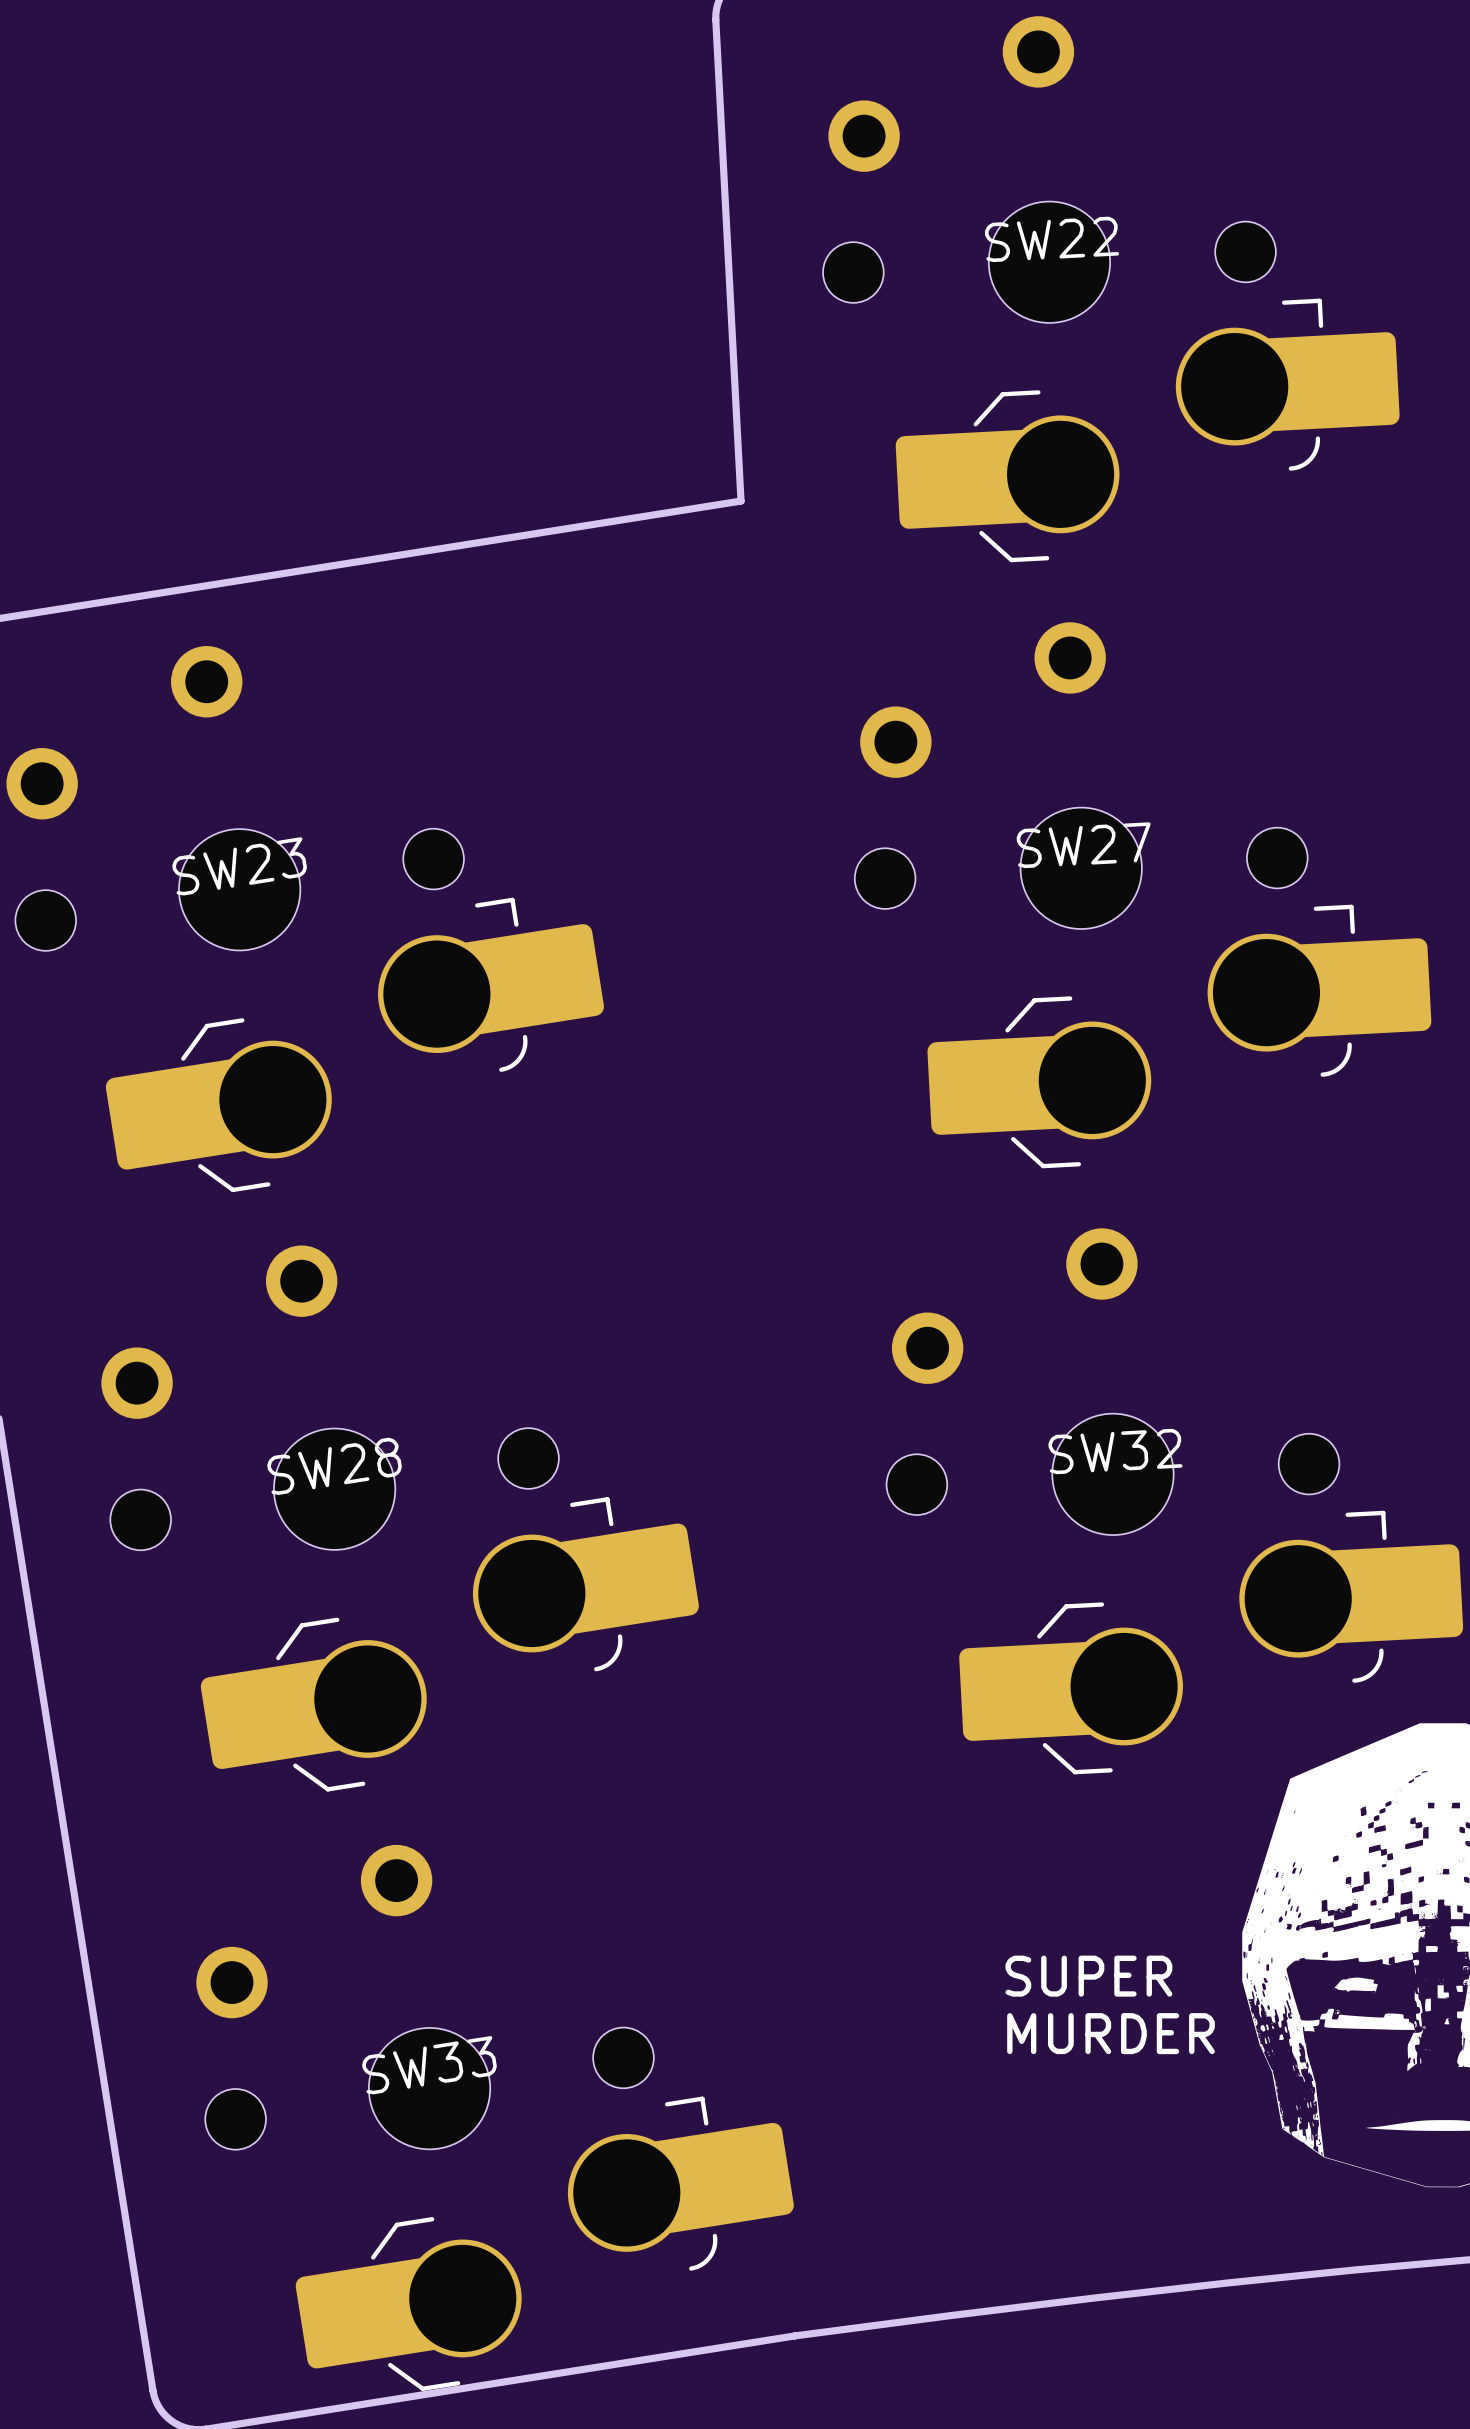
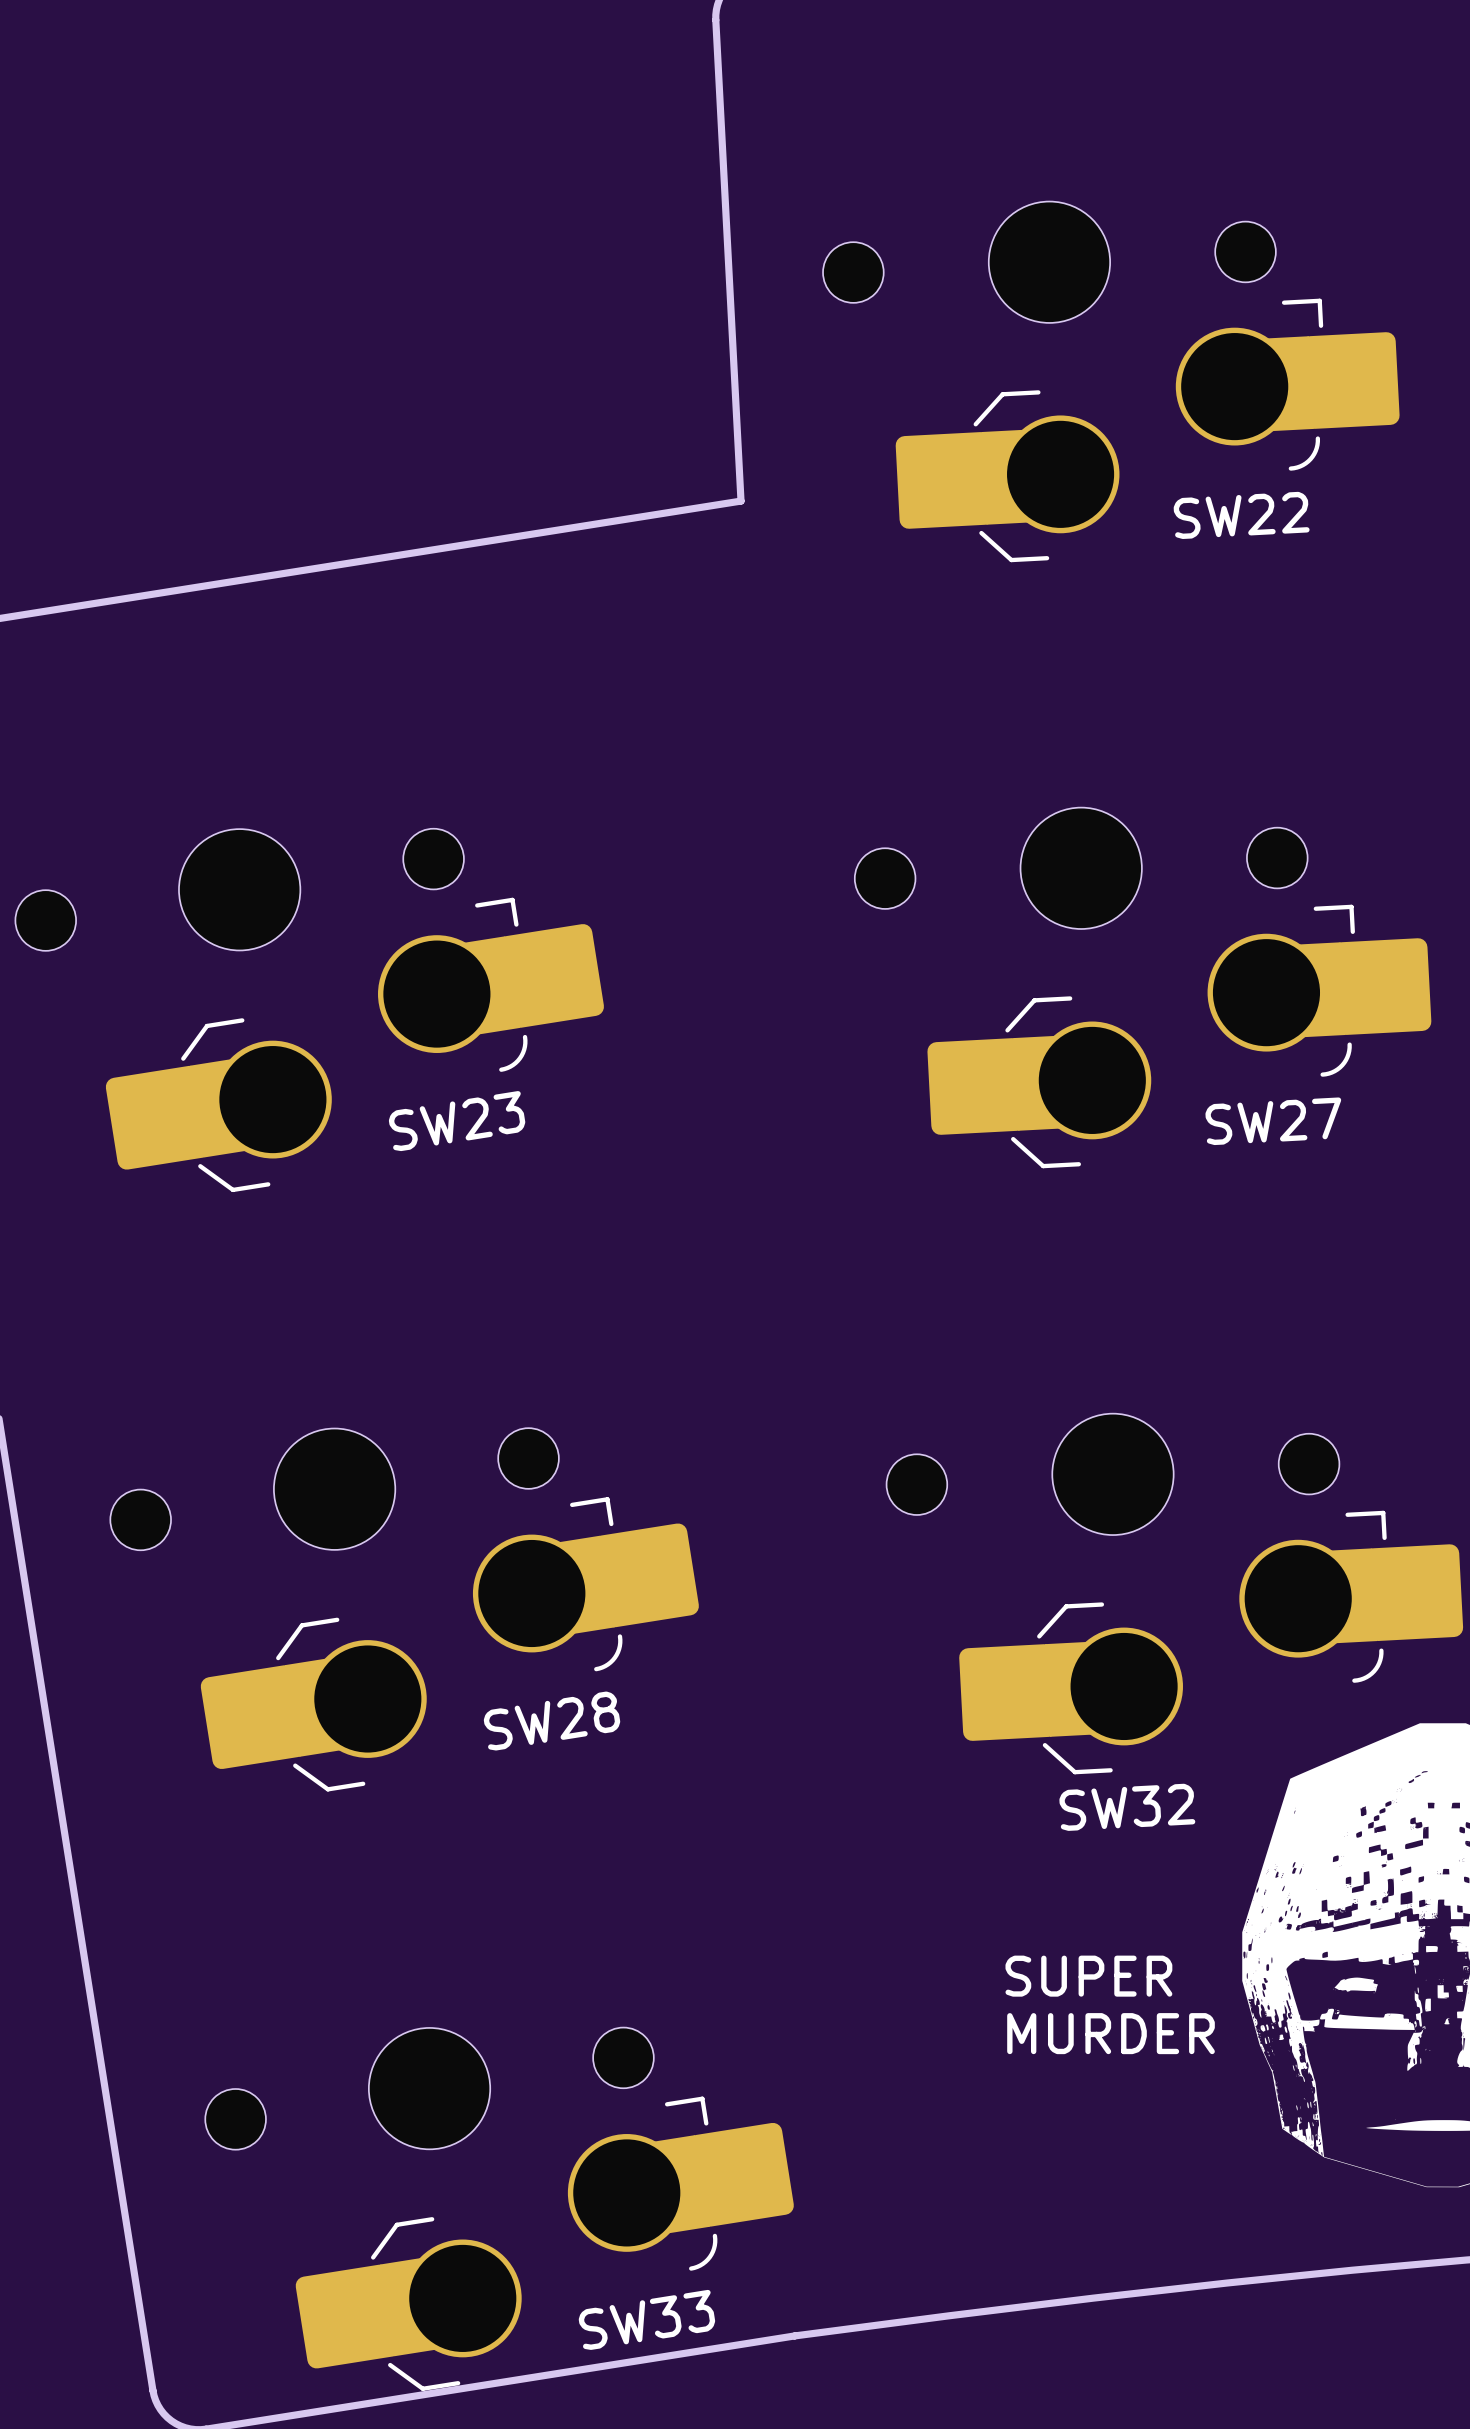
SW22 footprint: [823, 16, 1400, 563] -> [823, 201, 1400, 563]
SW22 name position: SW22 (1052, 239) -> SW22 (1241, 515)
SW27 footprint: [854, 622, 1432, 1169] -> [854, 807, 1432, 1169]
SW23 footprint: [6, 646, 604, 1193] -> [15, 828, 604, 1193]
SW27 name position: SW27 (1083, 845) -> SW27 (1273, 1121)
SW23 name position: SW23 (239, 866) -> SW23 (457, 1121)
SW32 footprint: [886, 1228, 1464, 1775] -> [886, 1413, 1464, 1775]
SW28 footprint: [101, 1245, 699, 1792] -> [110, 1428, 699, 1792]
SW32 name position: SW32 (1115, 1451) -> SW32 (1127, 1807)
SW28 name position: SW28 (334, 1466) -> SW28 (552, 1721)
SW33 footprint: [196, 1844, 794, 2391] -> [205, 2027, 794, 2391]
SW33 name position: SW33 (429, 2065) -> SW33 (646, 2319)

